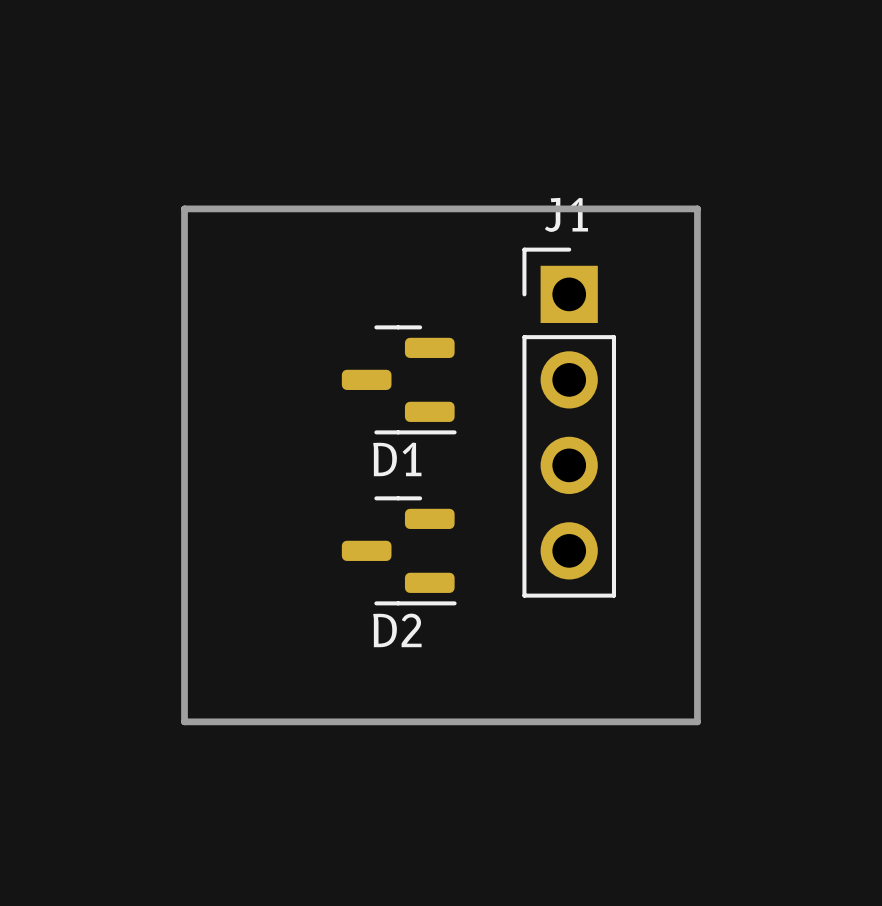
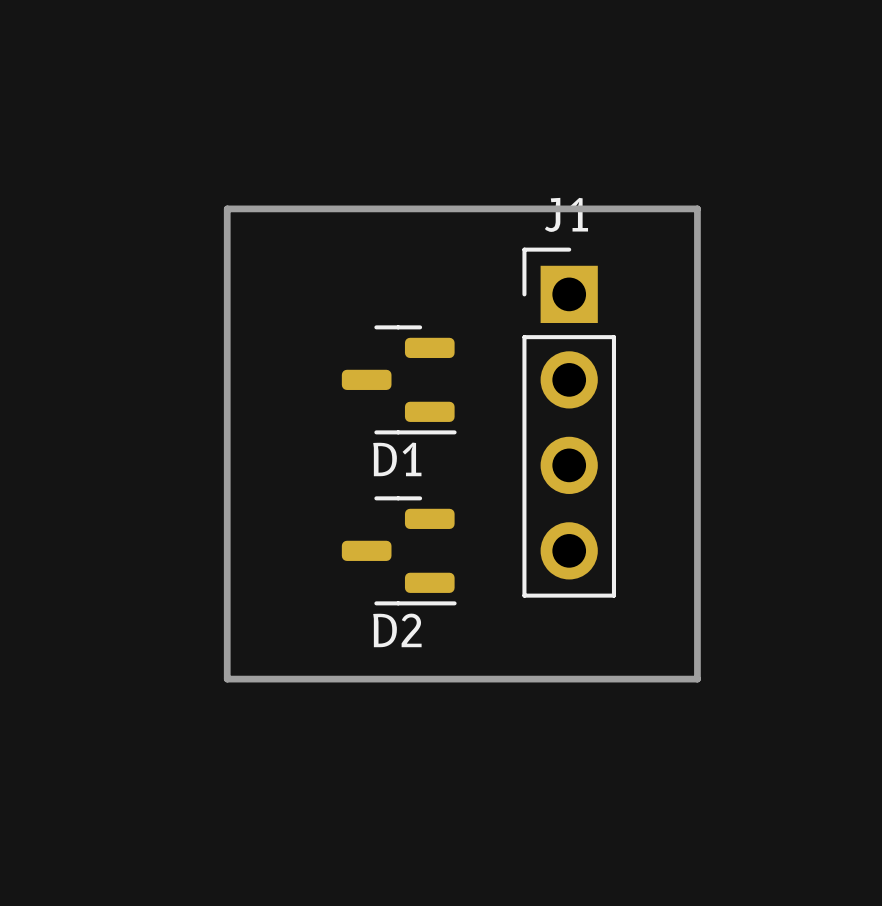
board edge: (227, 208) (184, 208) (184, 721) (697, 721) (697, 679) -> (227, 208) (227, 679) (697, 679)

